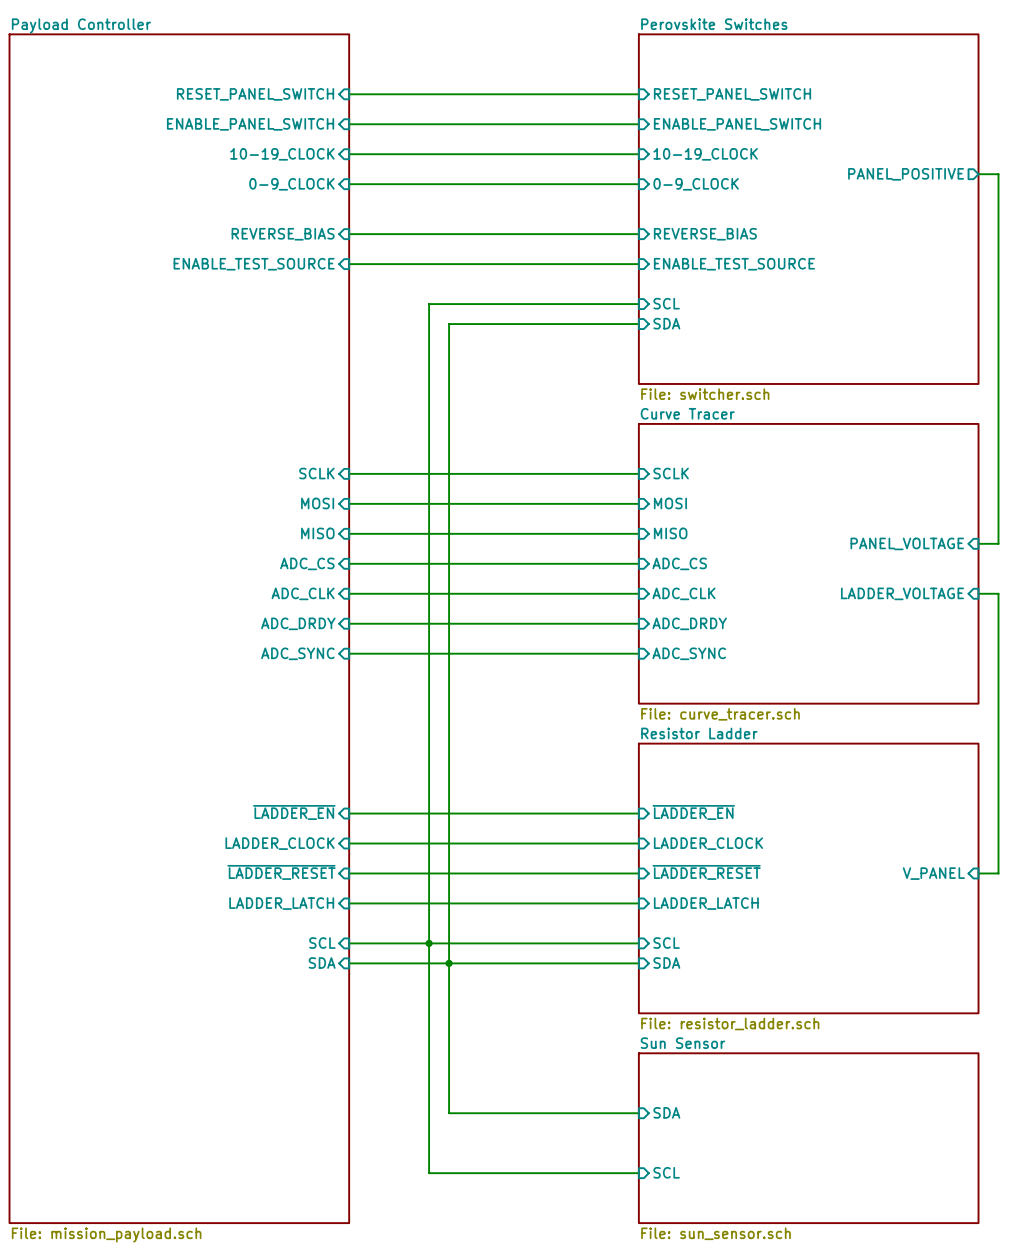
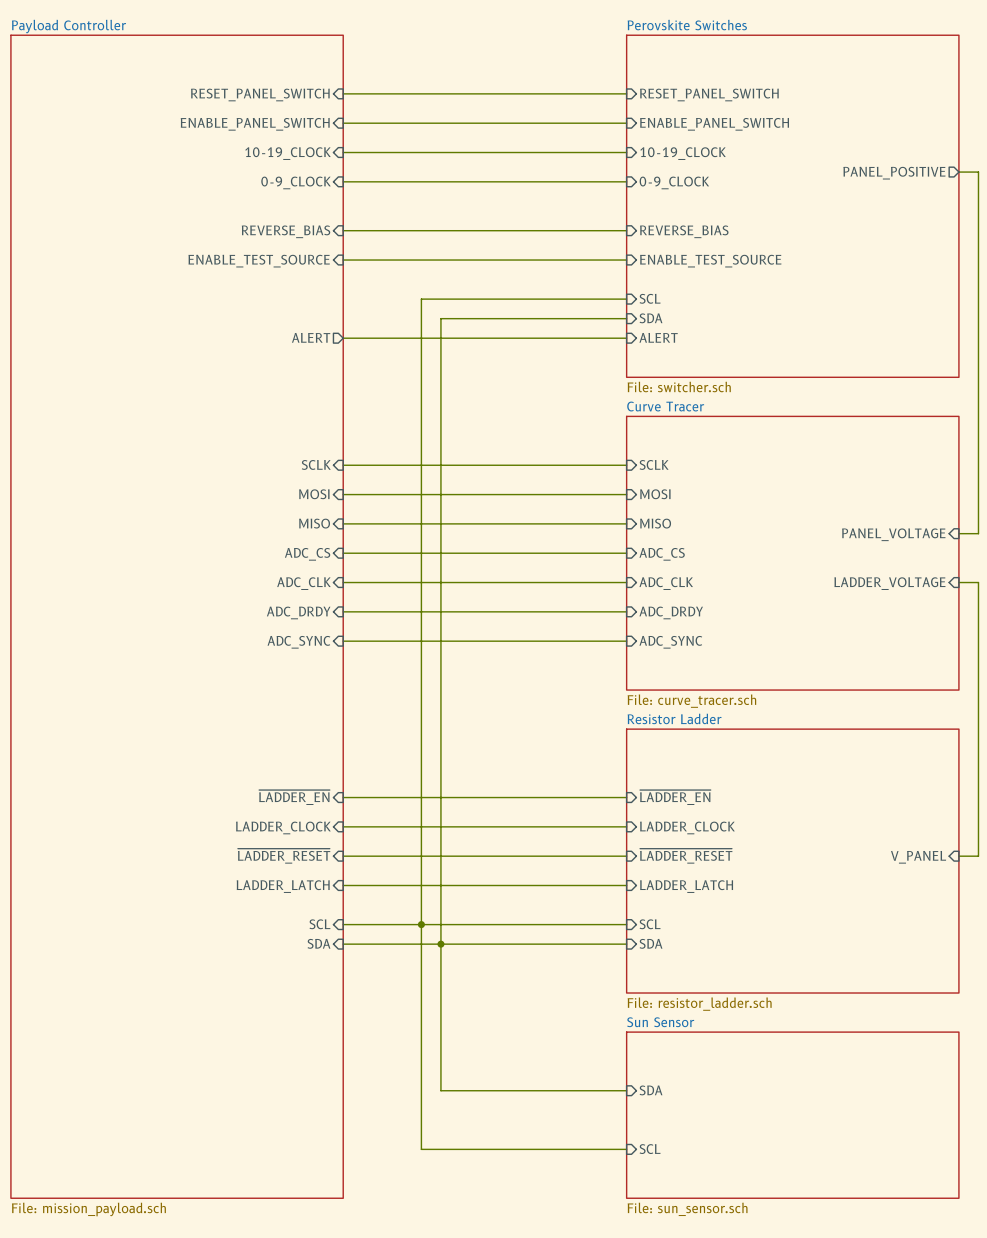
sheet pin: none -> ALERT (311, 337)
sheet pin: none -> ALERT (658, 337)
wire: none -> (343, 338) (626, 338)

